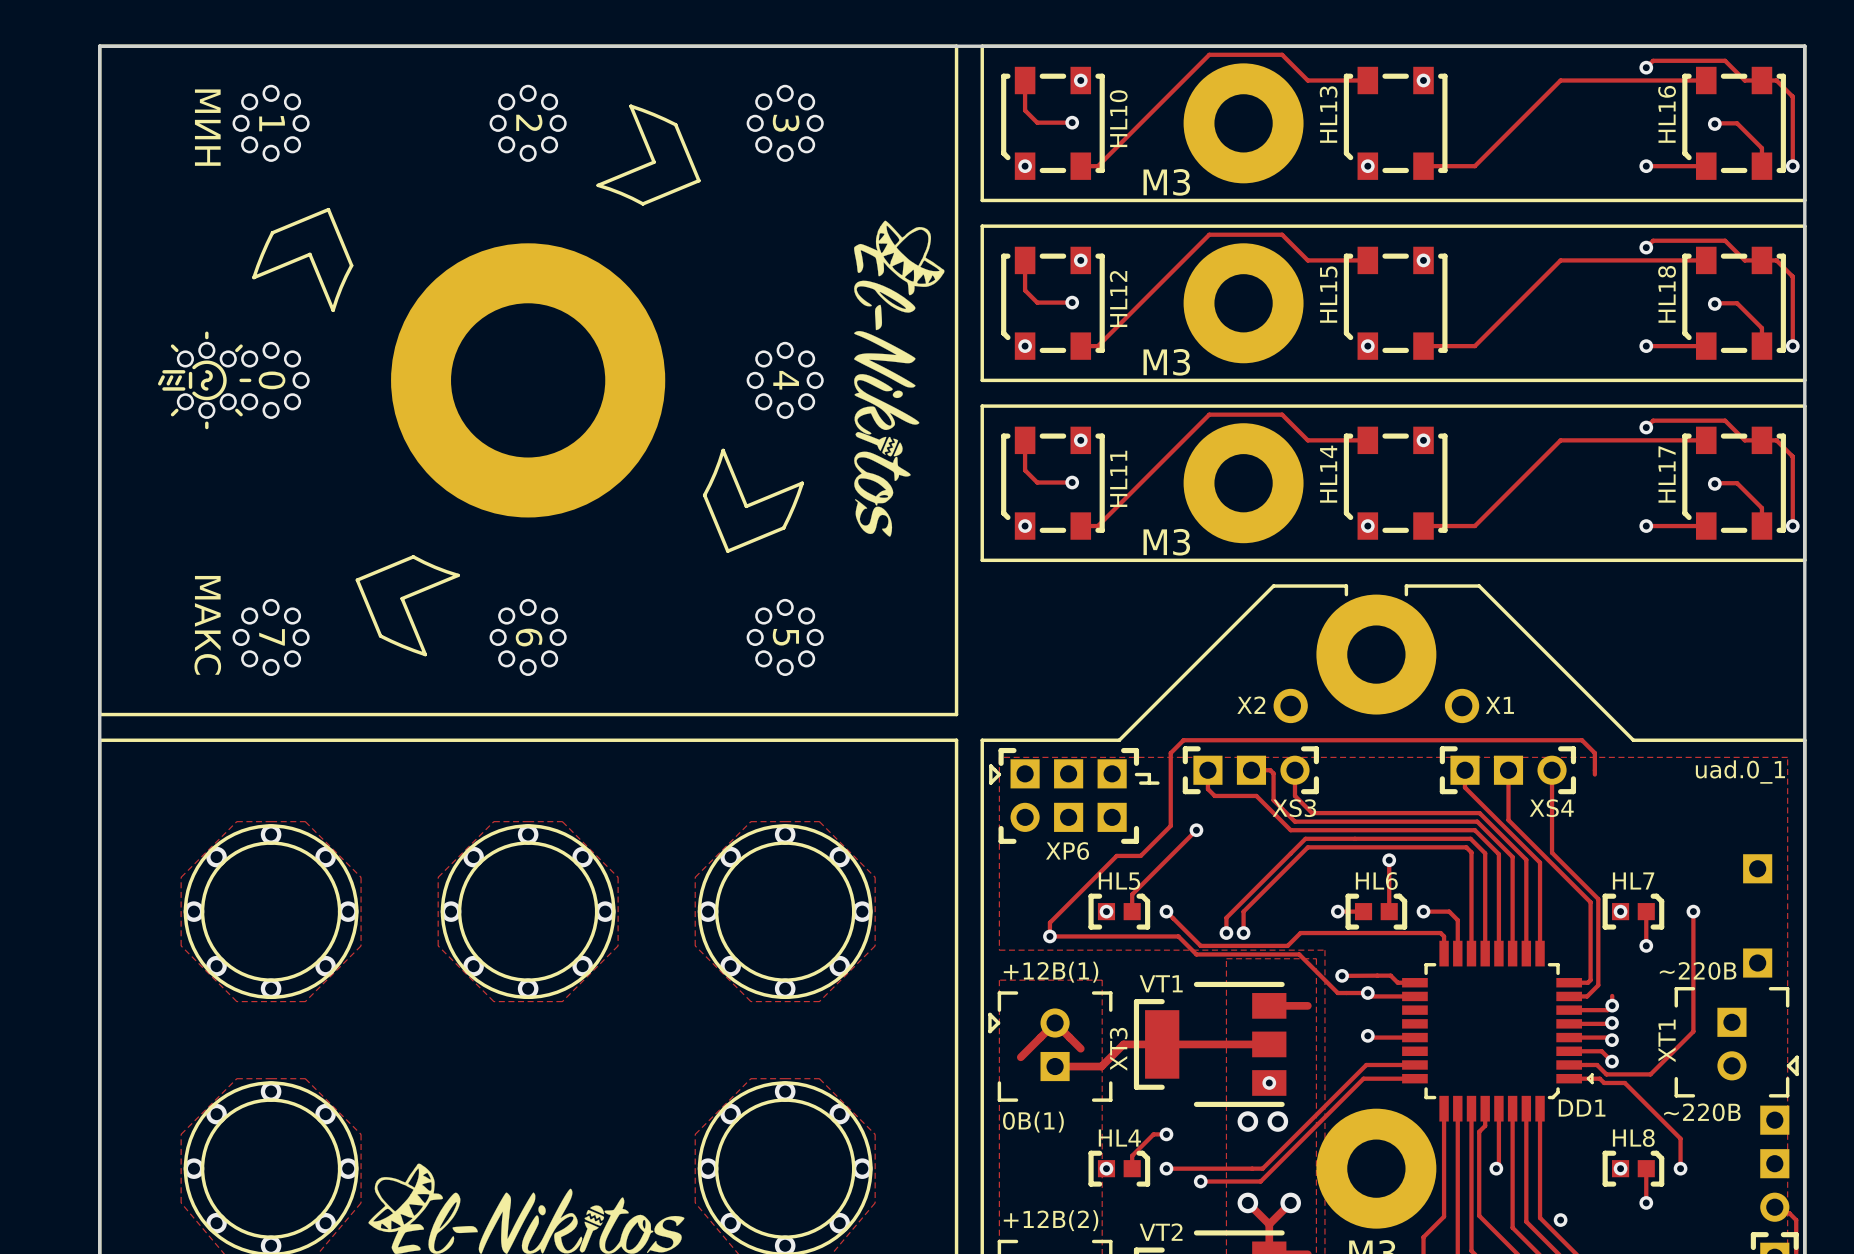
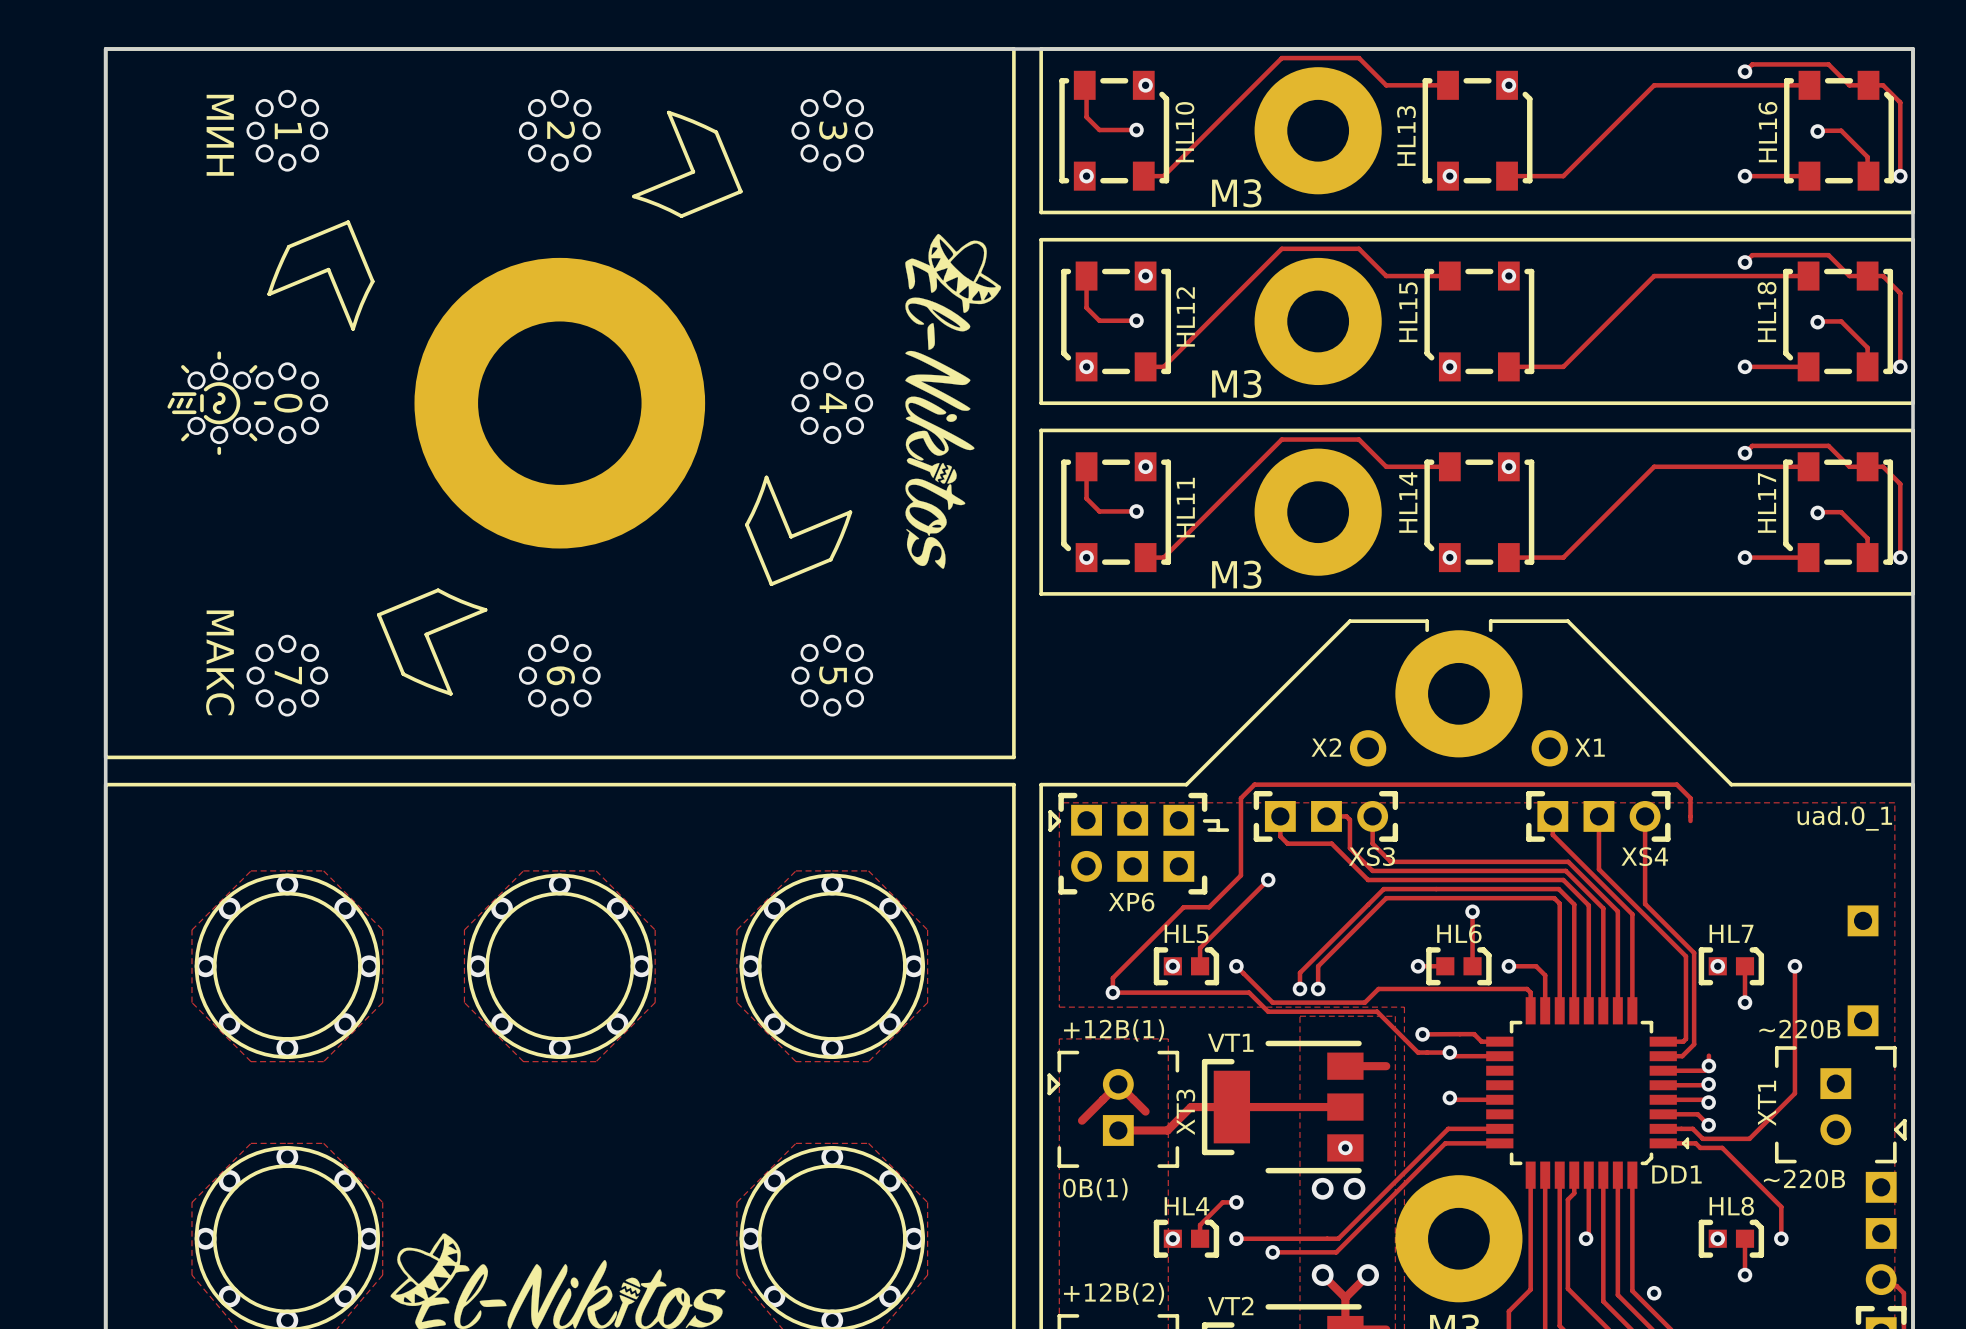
HL10 rotation: 0° (1052, 123) -> 180° (1114, 130)
HL13 rotation: 0° (1395, 123) -> 180° (1477, 130)
HL16 rotation: 0° (1734, 123) -> 180° (1839, 130)

